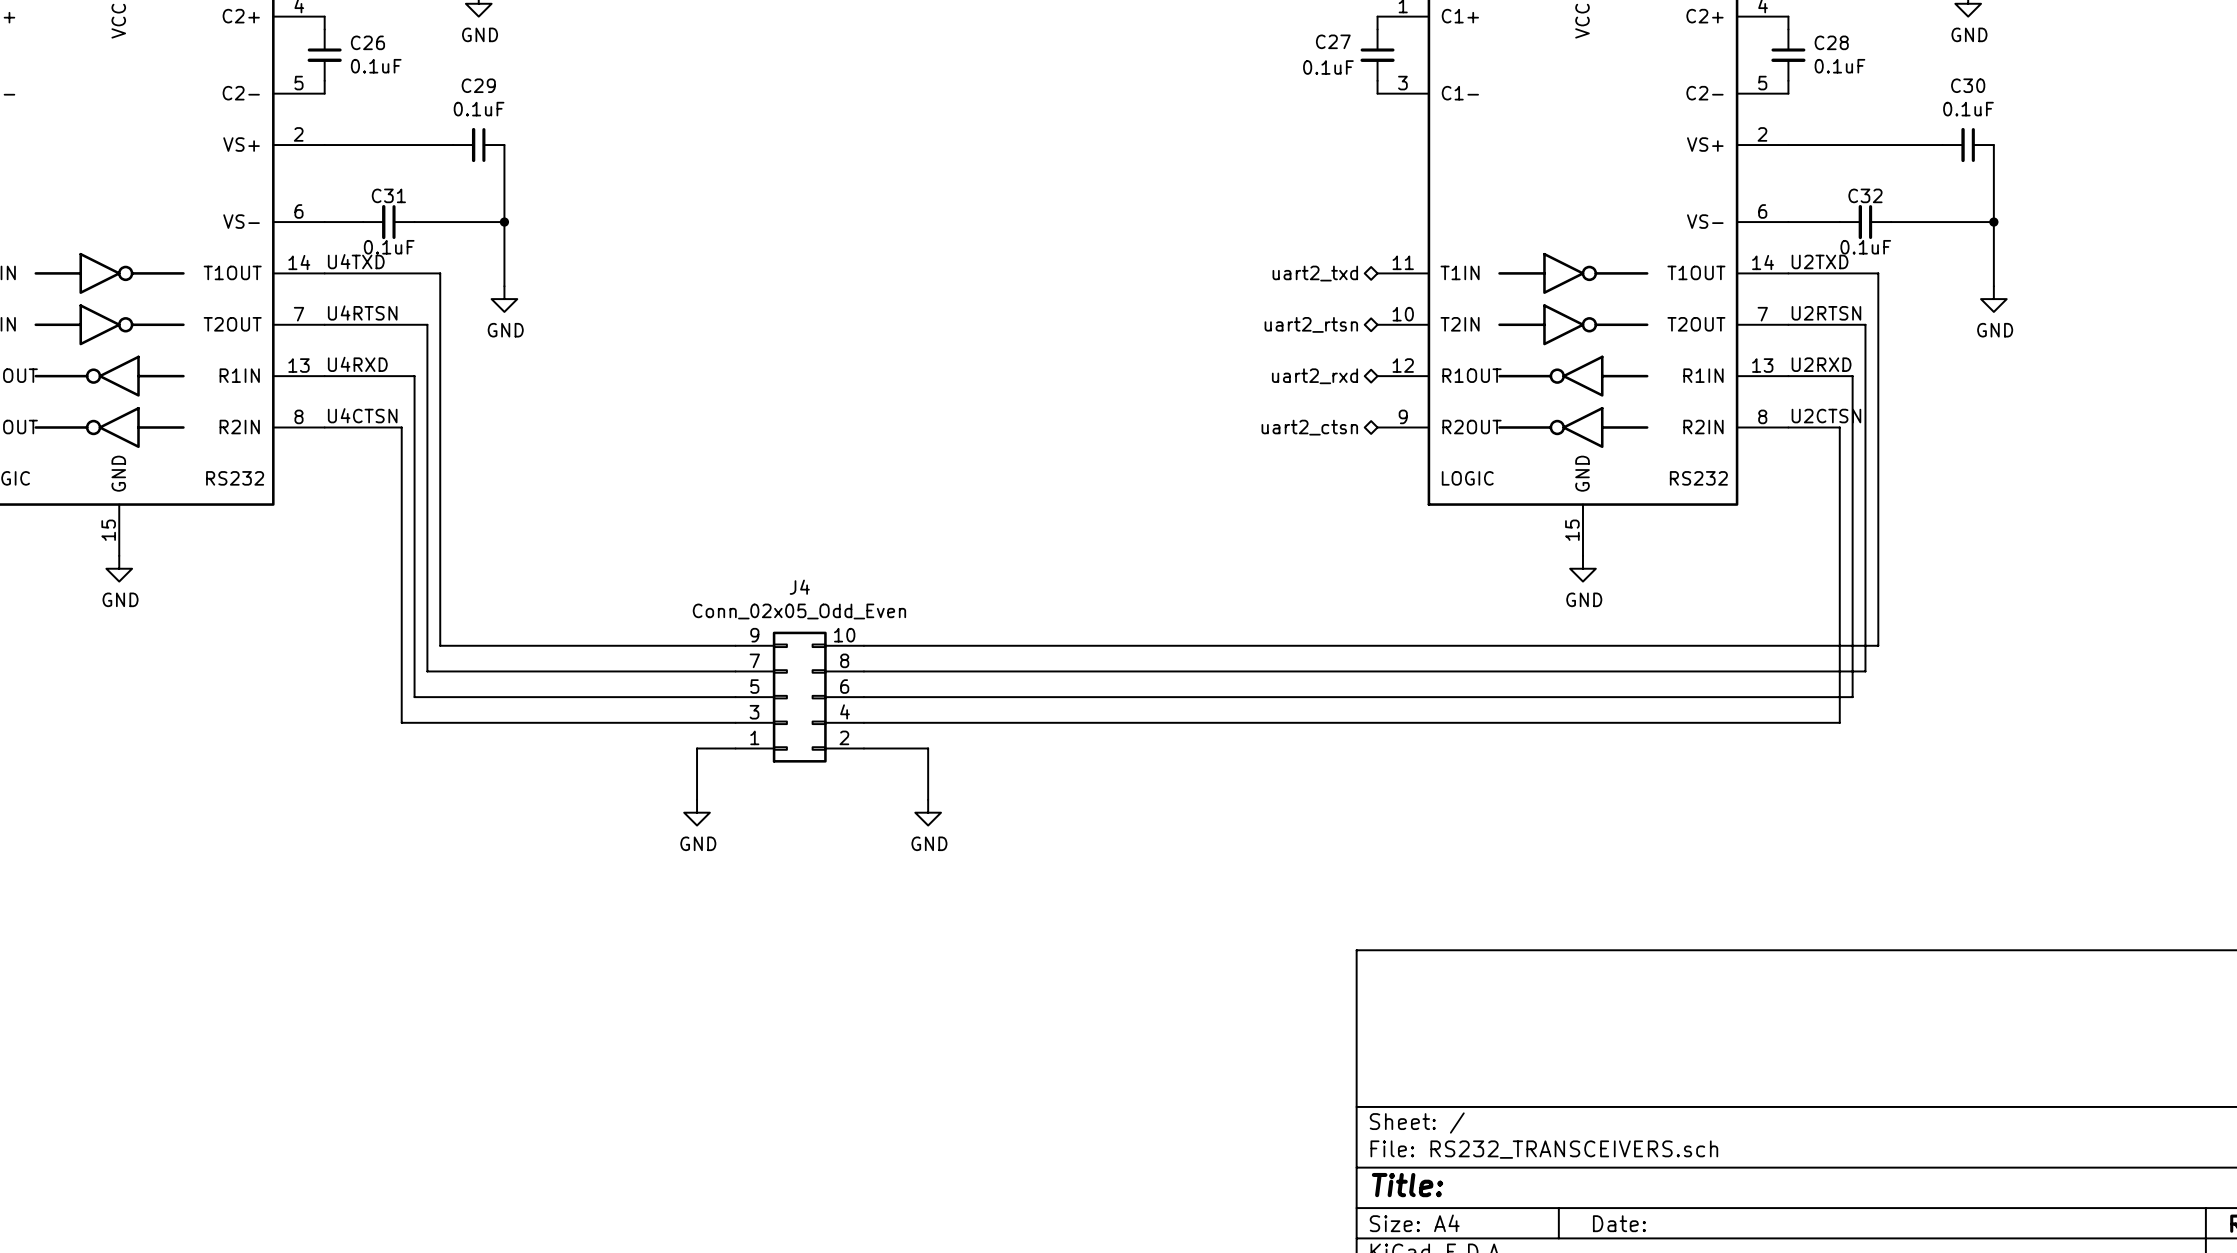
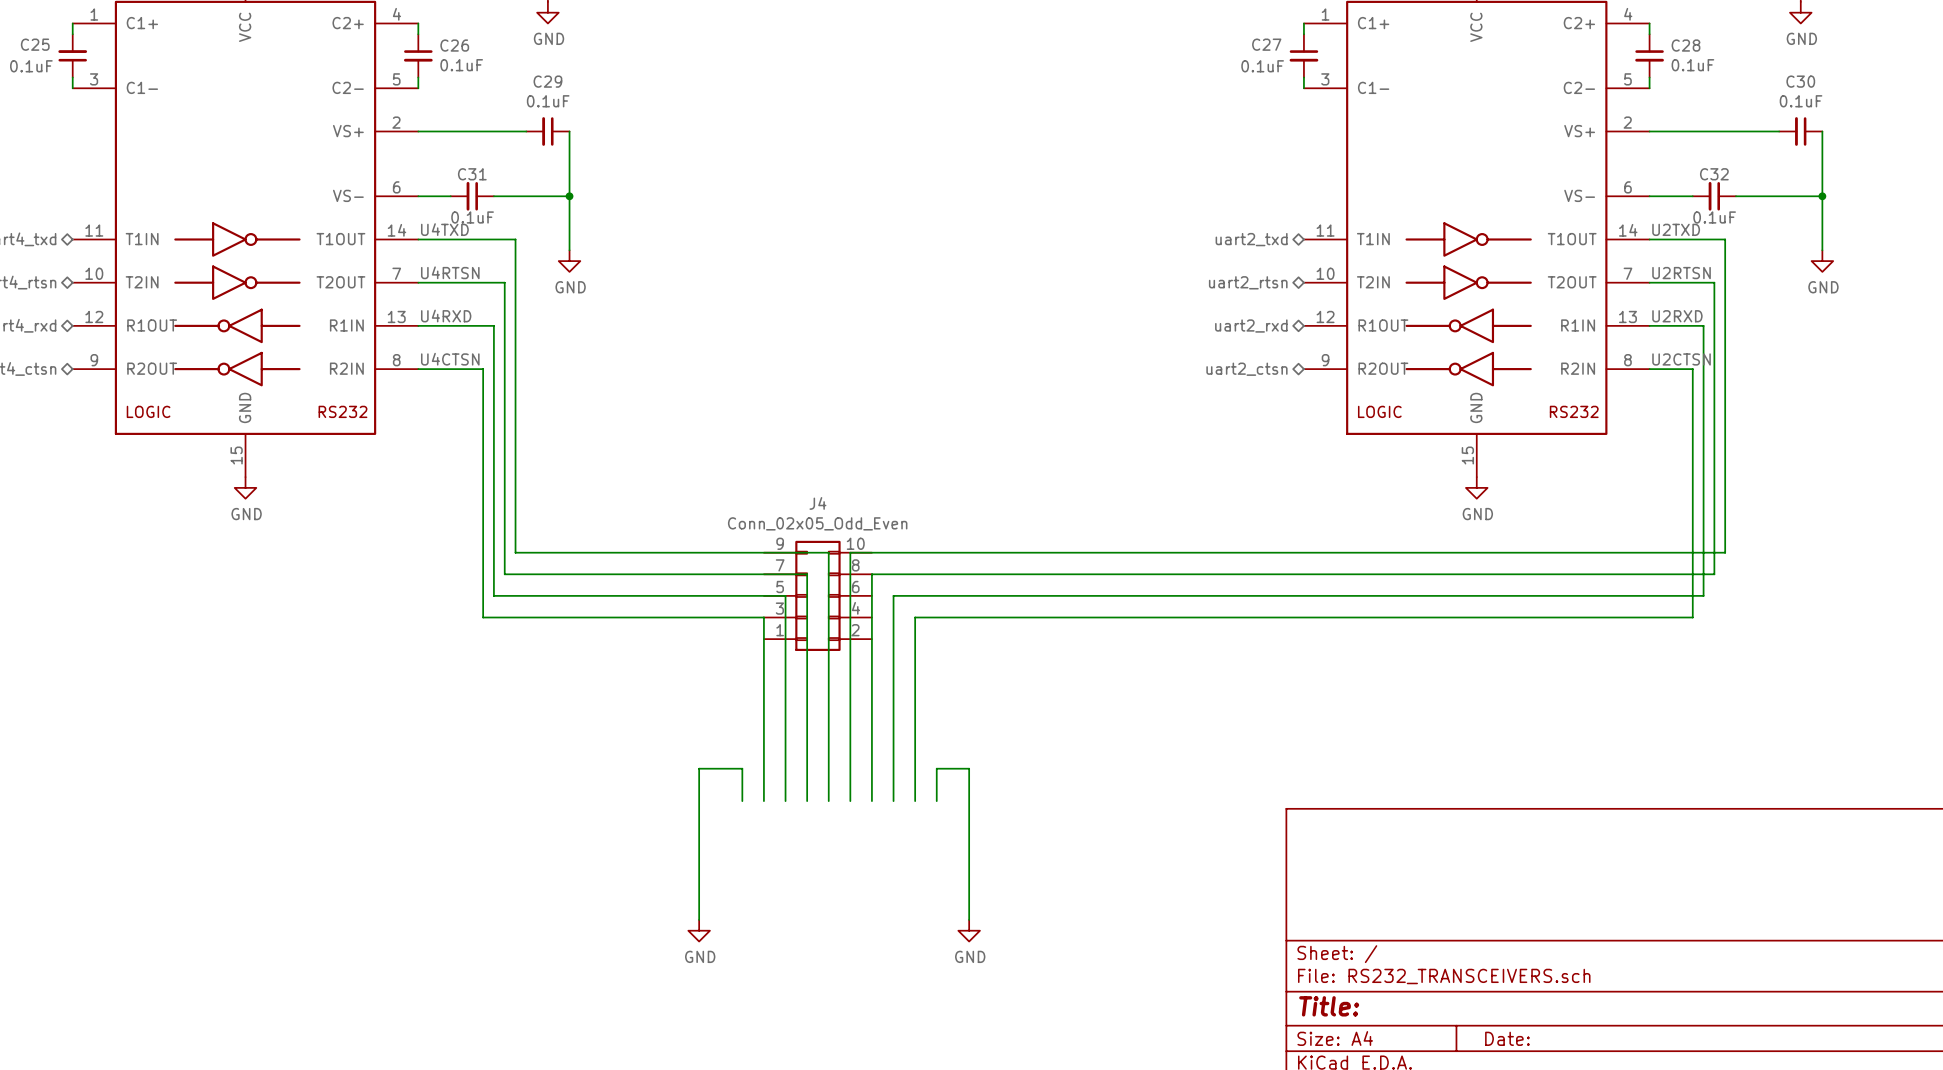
wire: none -> (763, 552) (828, 552) (828, 801)
wire: none -> (871, 552) (850, 552) (850, 801)
wire: none -> (763, 574) (807, 574) (807, 801)
wire: none -> (871, 574) (871, 801)
wire: none -> (763, 595) (785, 595) (785, 801)
wire: (863, 697) (889, 697) -> (893, 801) (893, 595)
wire: none -> (763, 617) (763, 801)
wire: (863, 722) (915, 722) -> (915, 801) (915, 617)
wire: (735, 748) (697, 748) (697, 799) -> none
wire: (863, 748) (928, 748) (928, 799) -> none
power symbol: GND (697, 812) -> none
power symbol: GND (928, 812) -> none
wire: none -> (742, 801) (742, 768) (699, 768) (699, 919)
wire: none -> (936, 801) (936, 768) (969, 768) (969, 919)
power symbol: none -> GND (699, 930)
power symbol: none -> GND (969, 930)

